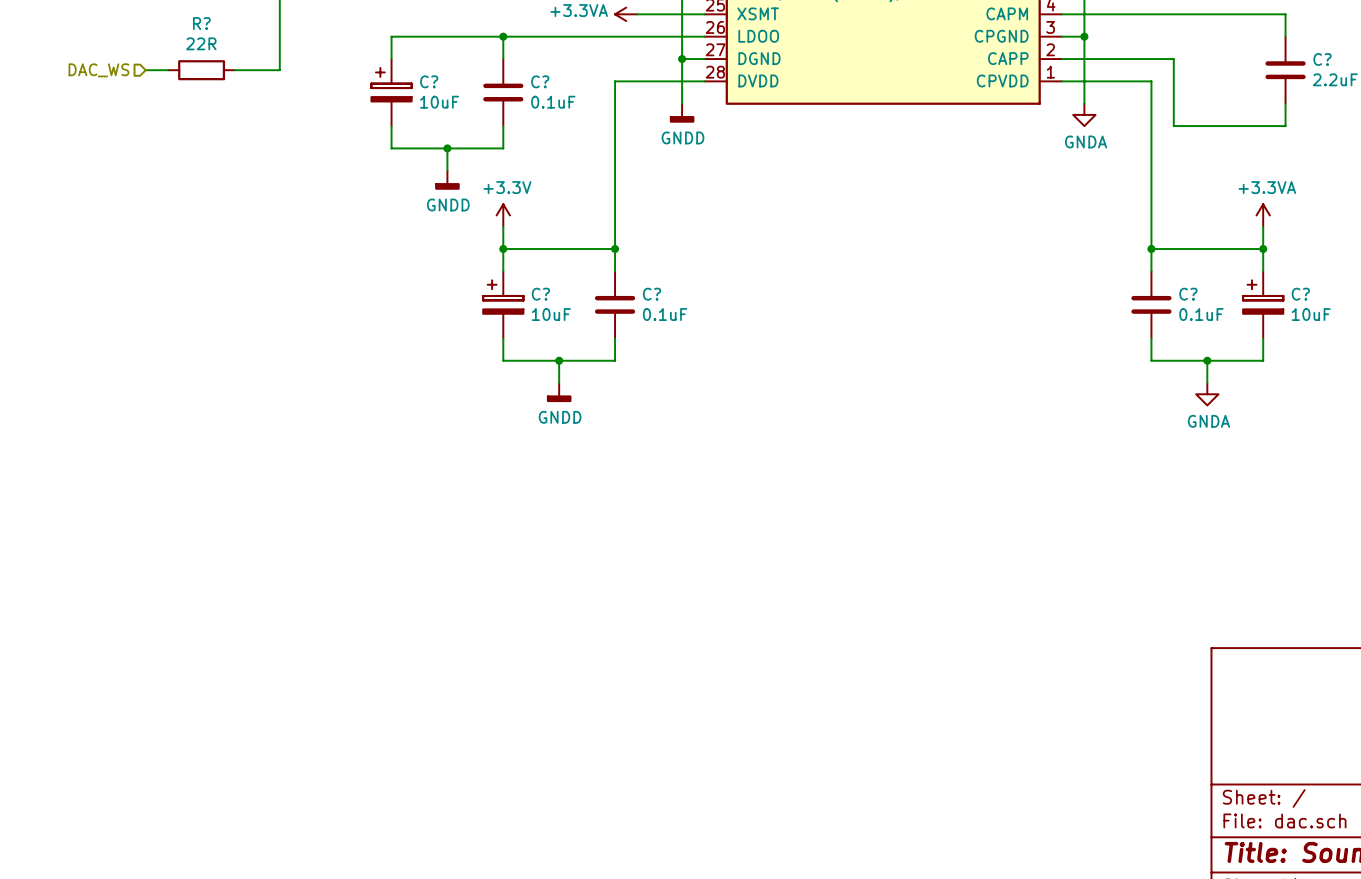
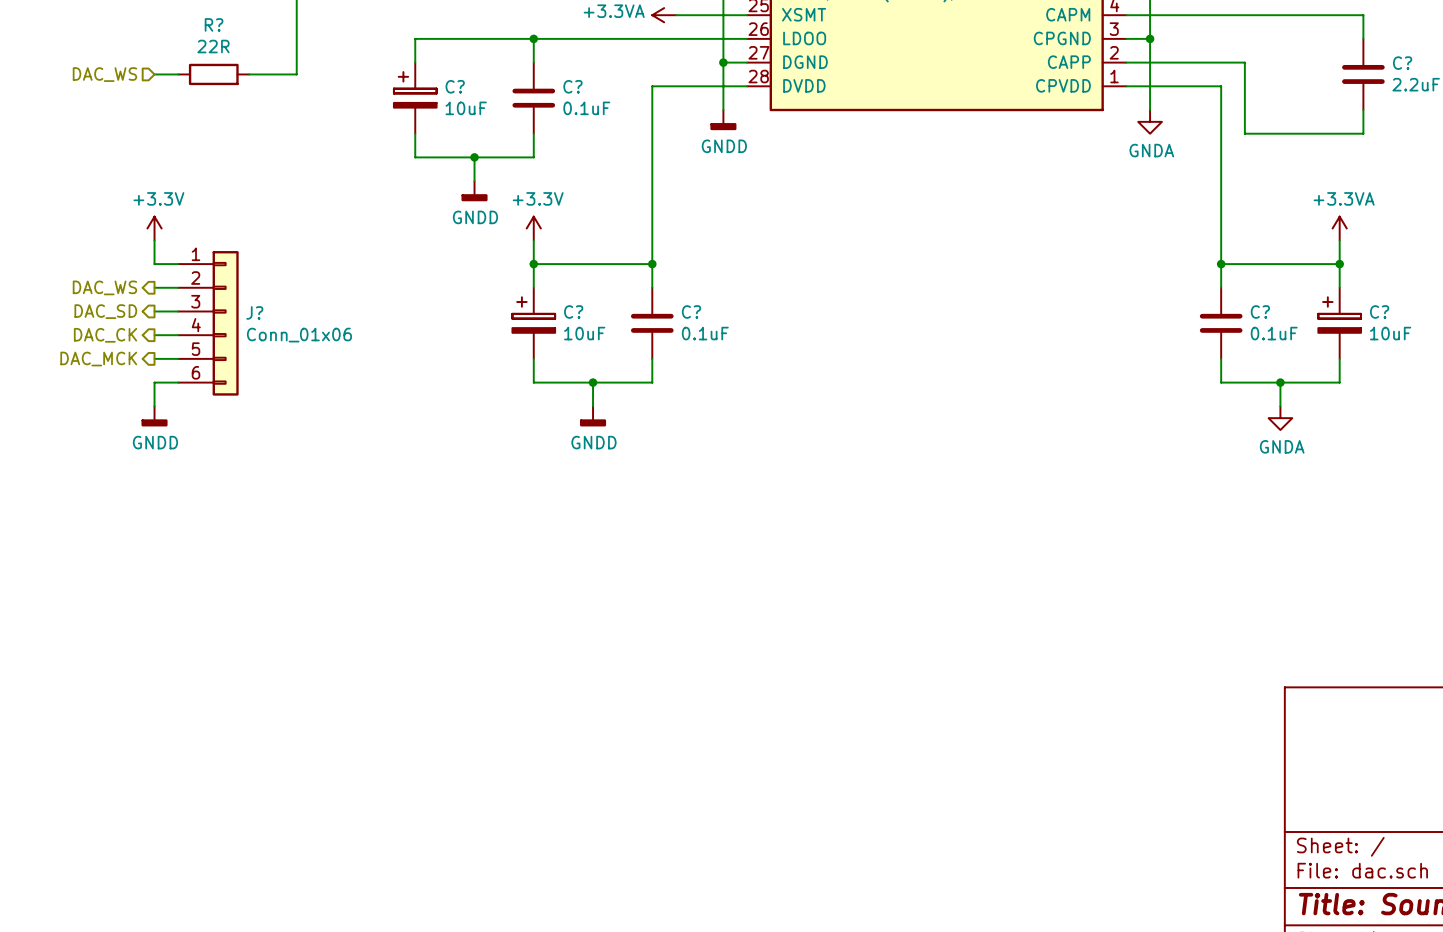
power symbol: none -> +3.3V (154, 228)
wire: none -> (154, 240) (154, 264) (178, 264)
hierarchical label: none -> DAC_WS (104, 287)
wire: none -> (154, 287) (178, 287)
hierarchical label: none -> DAC_SD (105, 311)
wire: none -> (154, 311) (178, 311)
J?: none -> Conn_01x06 (208, 323)
hierarchical label: none -> DAC_CK (105, 335)
wire: none -> (154, 335) (178, 335)
hierarchical label: none -> DAC_MCK (98, 359)
wire: none -> (154, 358) (178, 358)
wire: none -> (178, 382) (154, 382) (154, 406)
power symbol: none -> GNDD (154, 416)

